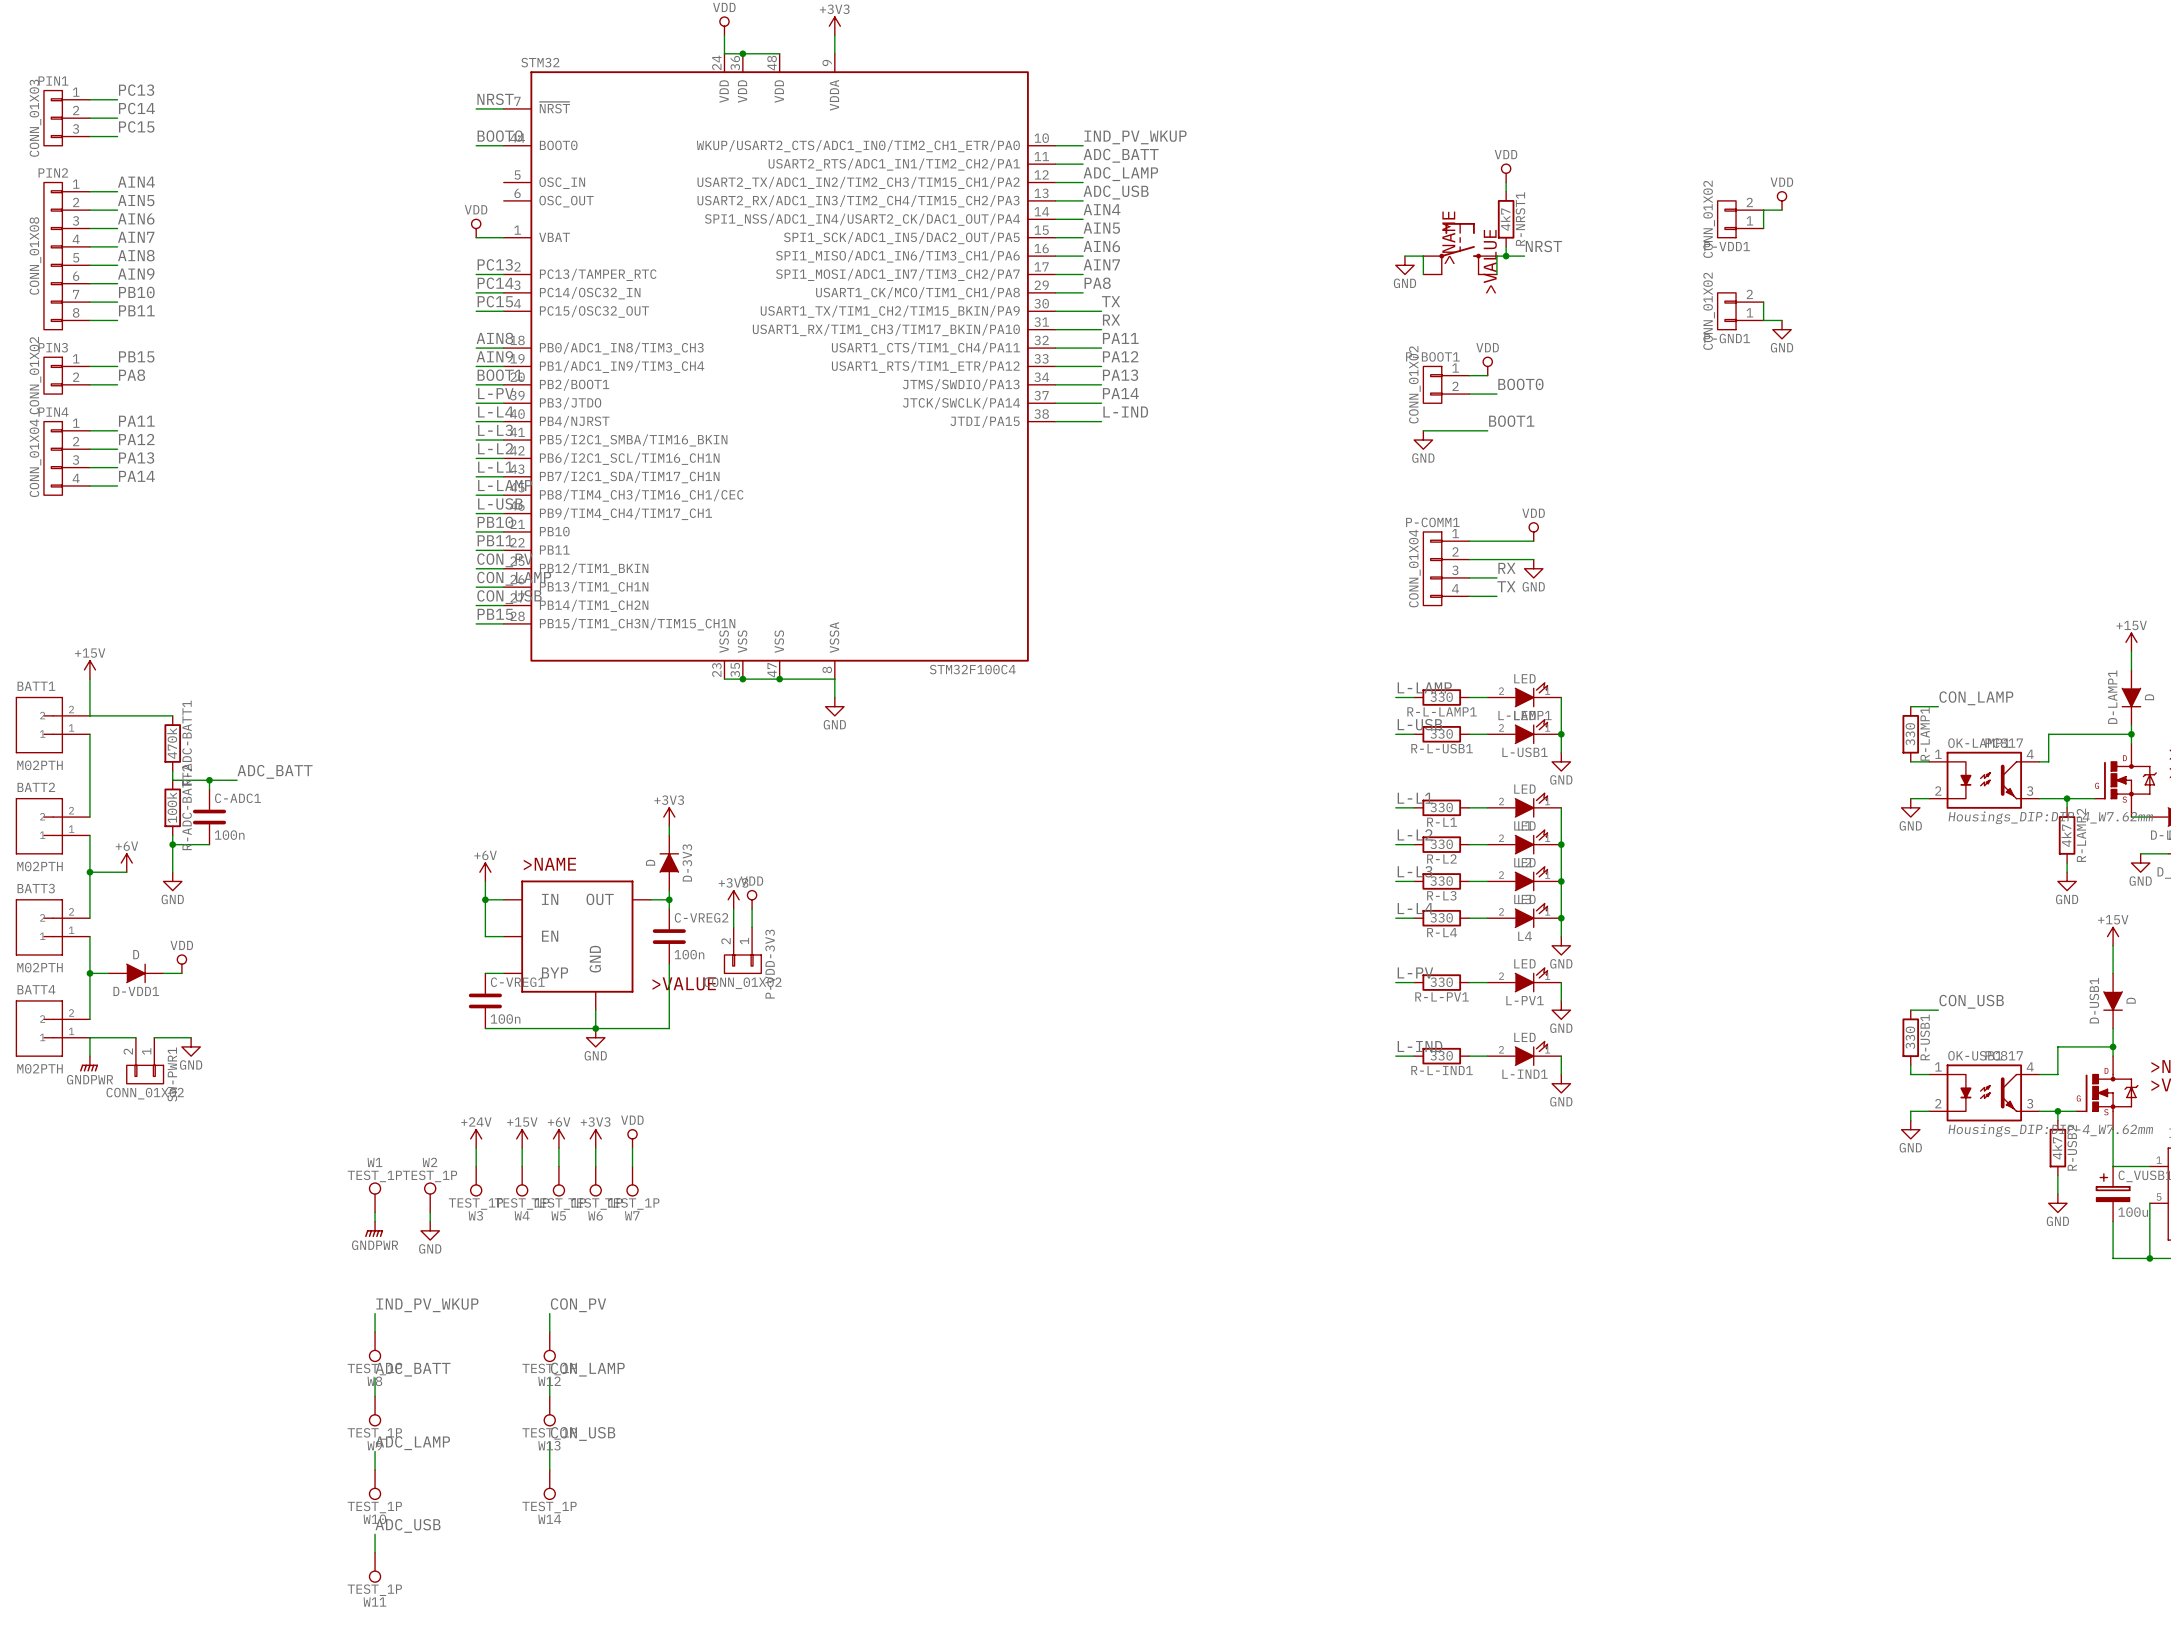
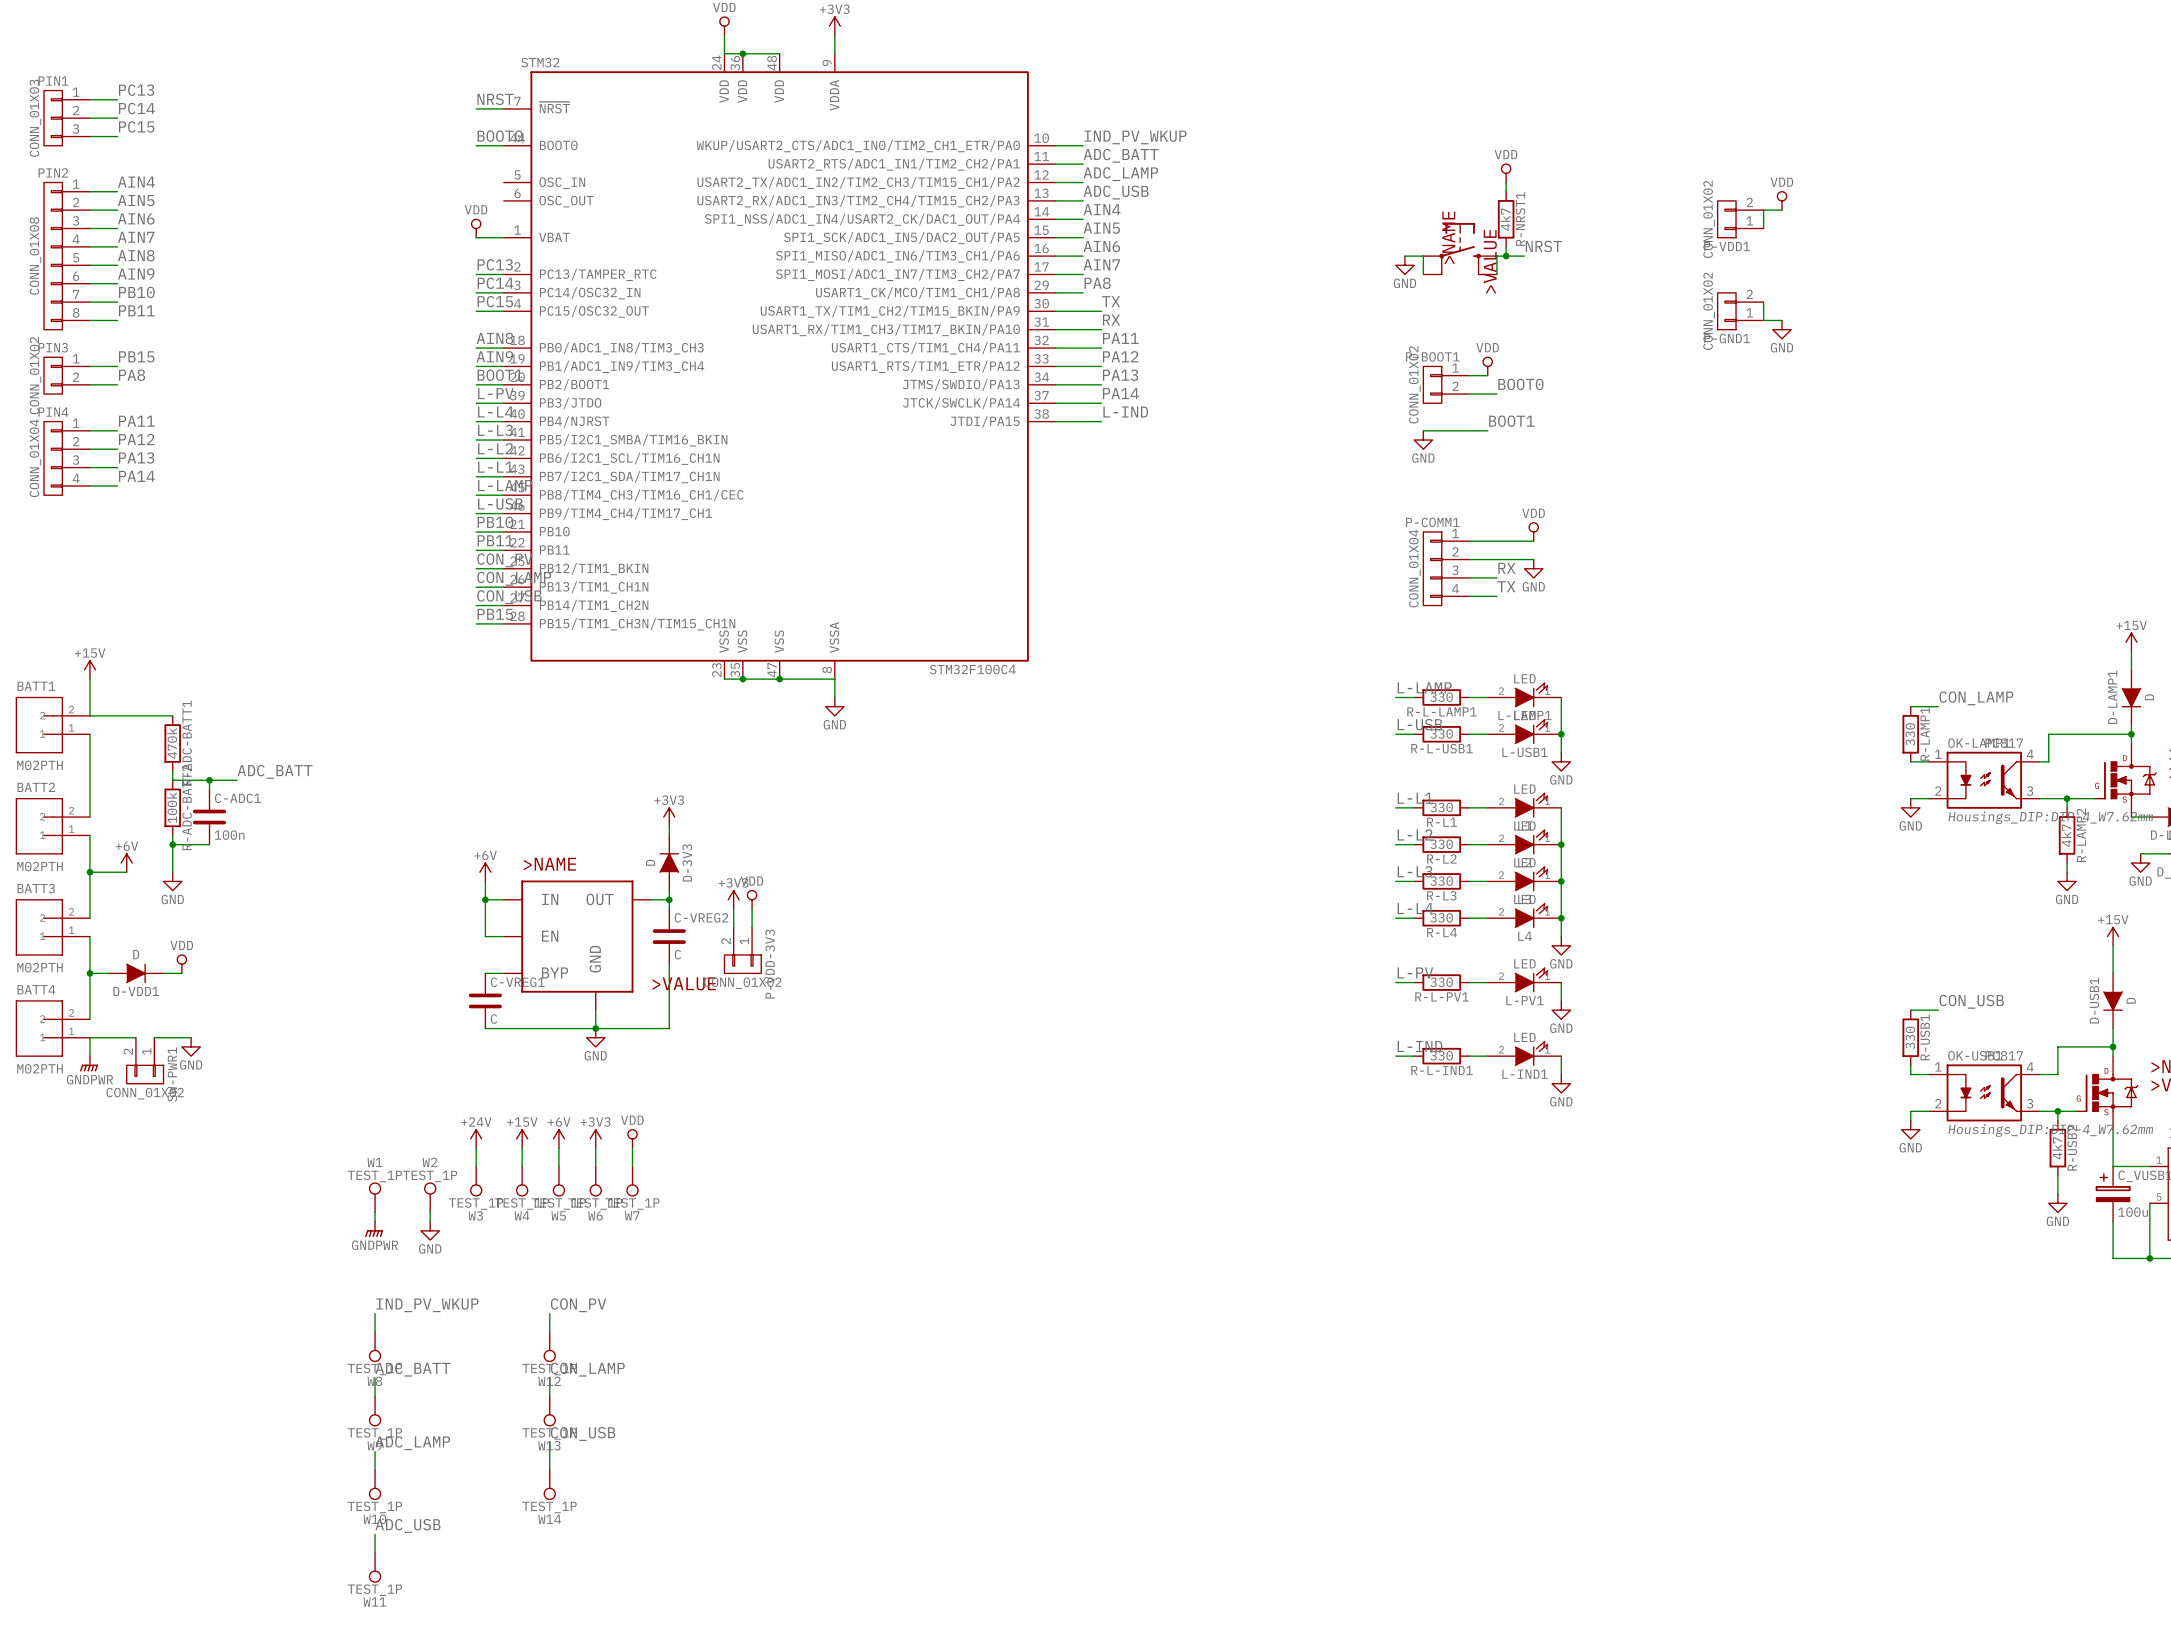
C-VREG2 value: 100n (689, 954) -> C (677, 954)
C-VREG1 value: 100n (505, 1019) -> C (493, 1019)

